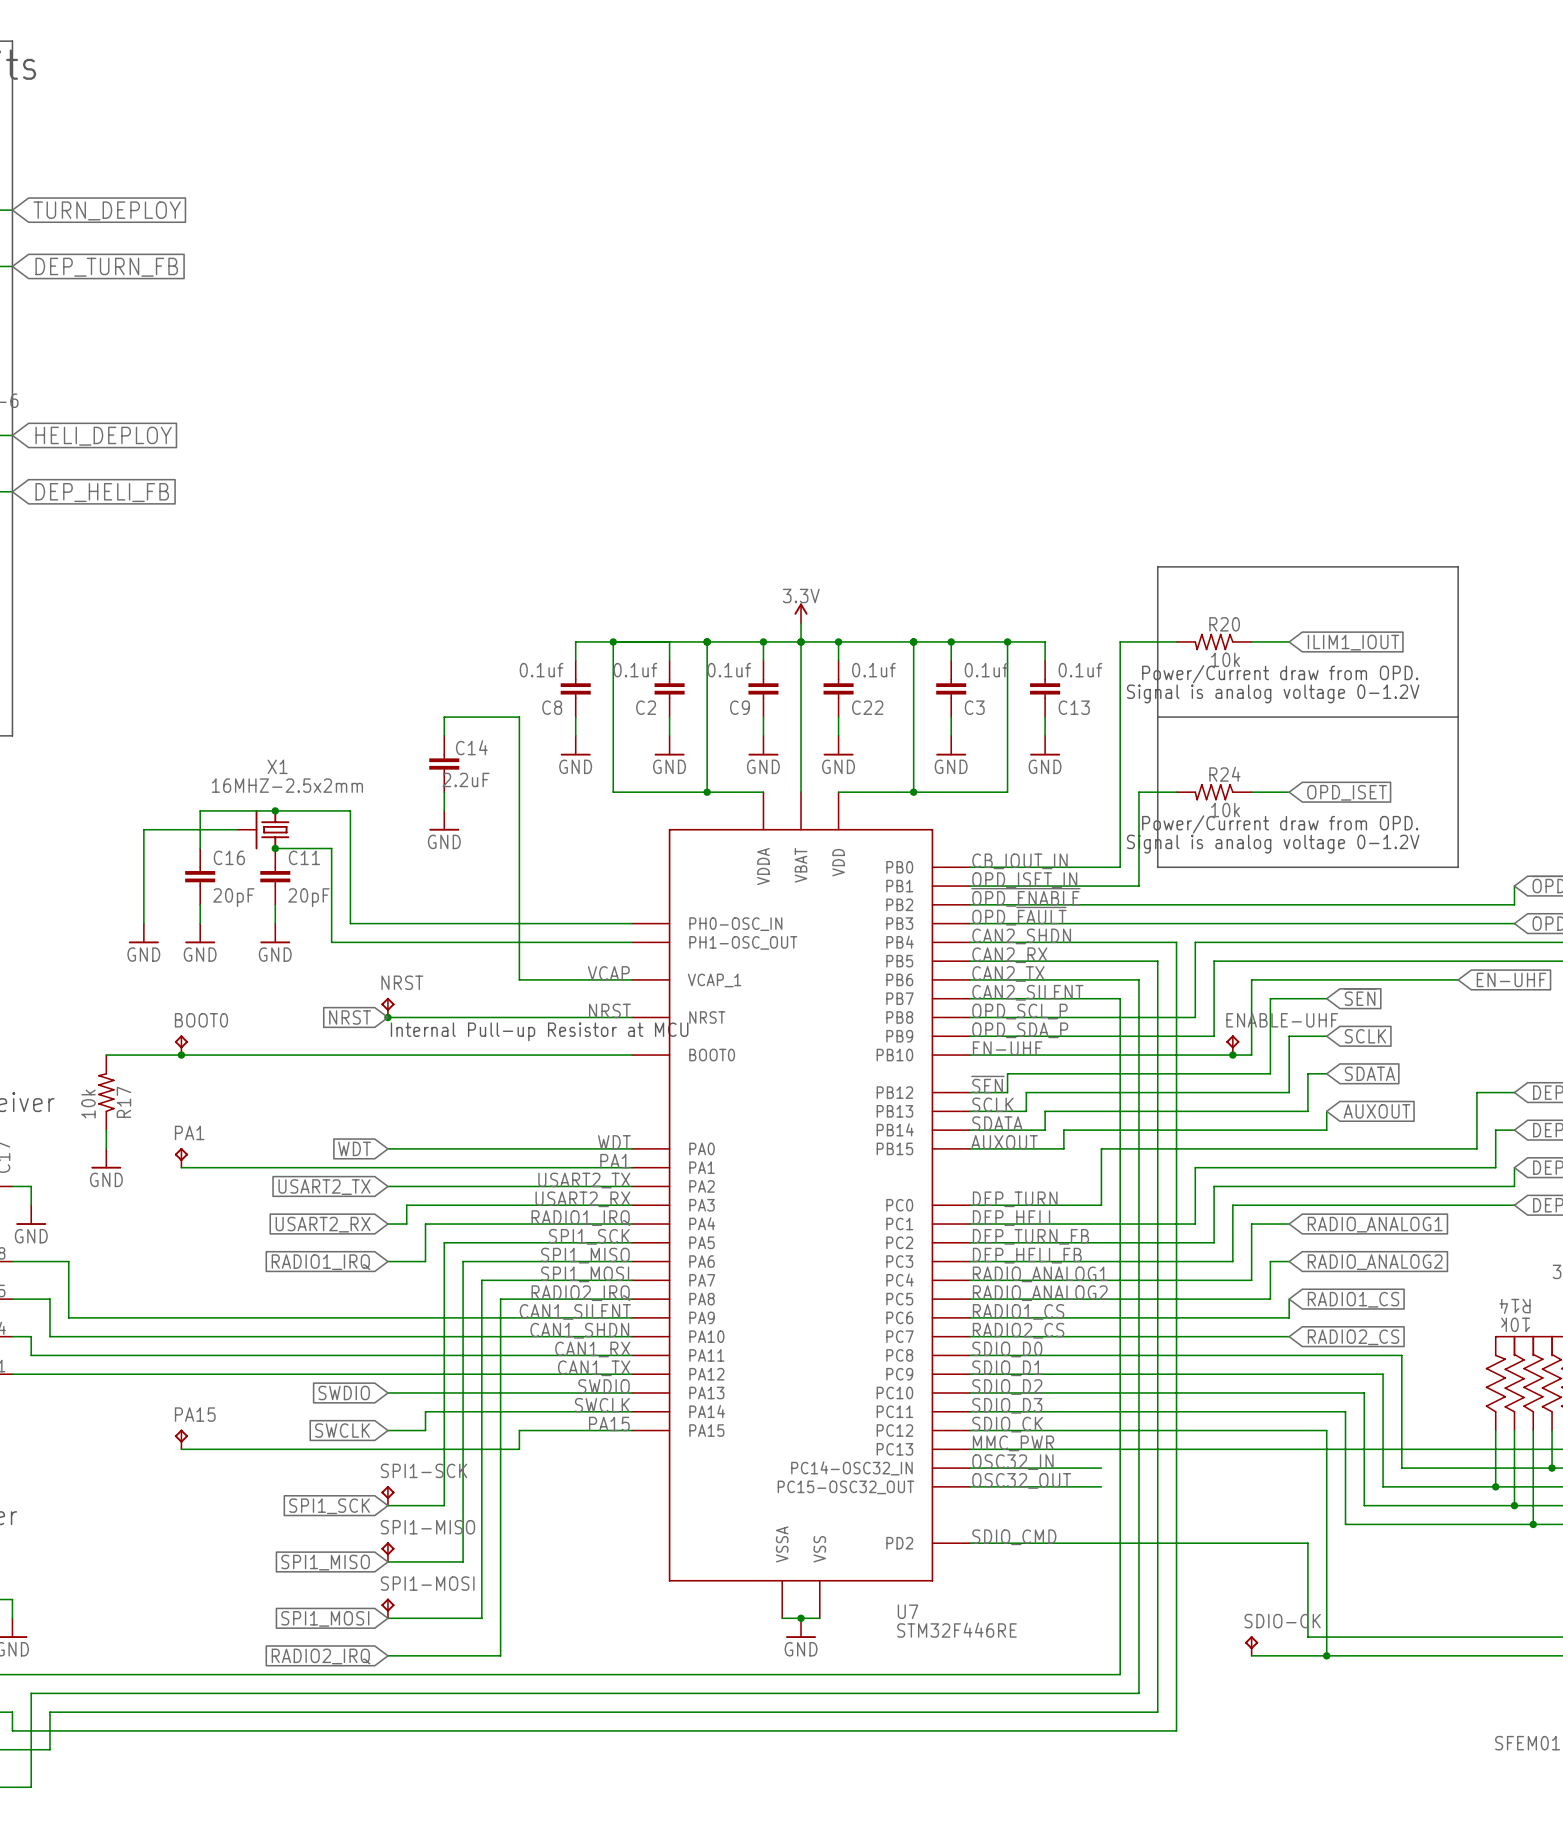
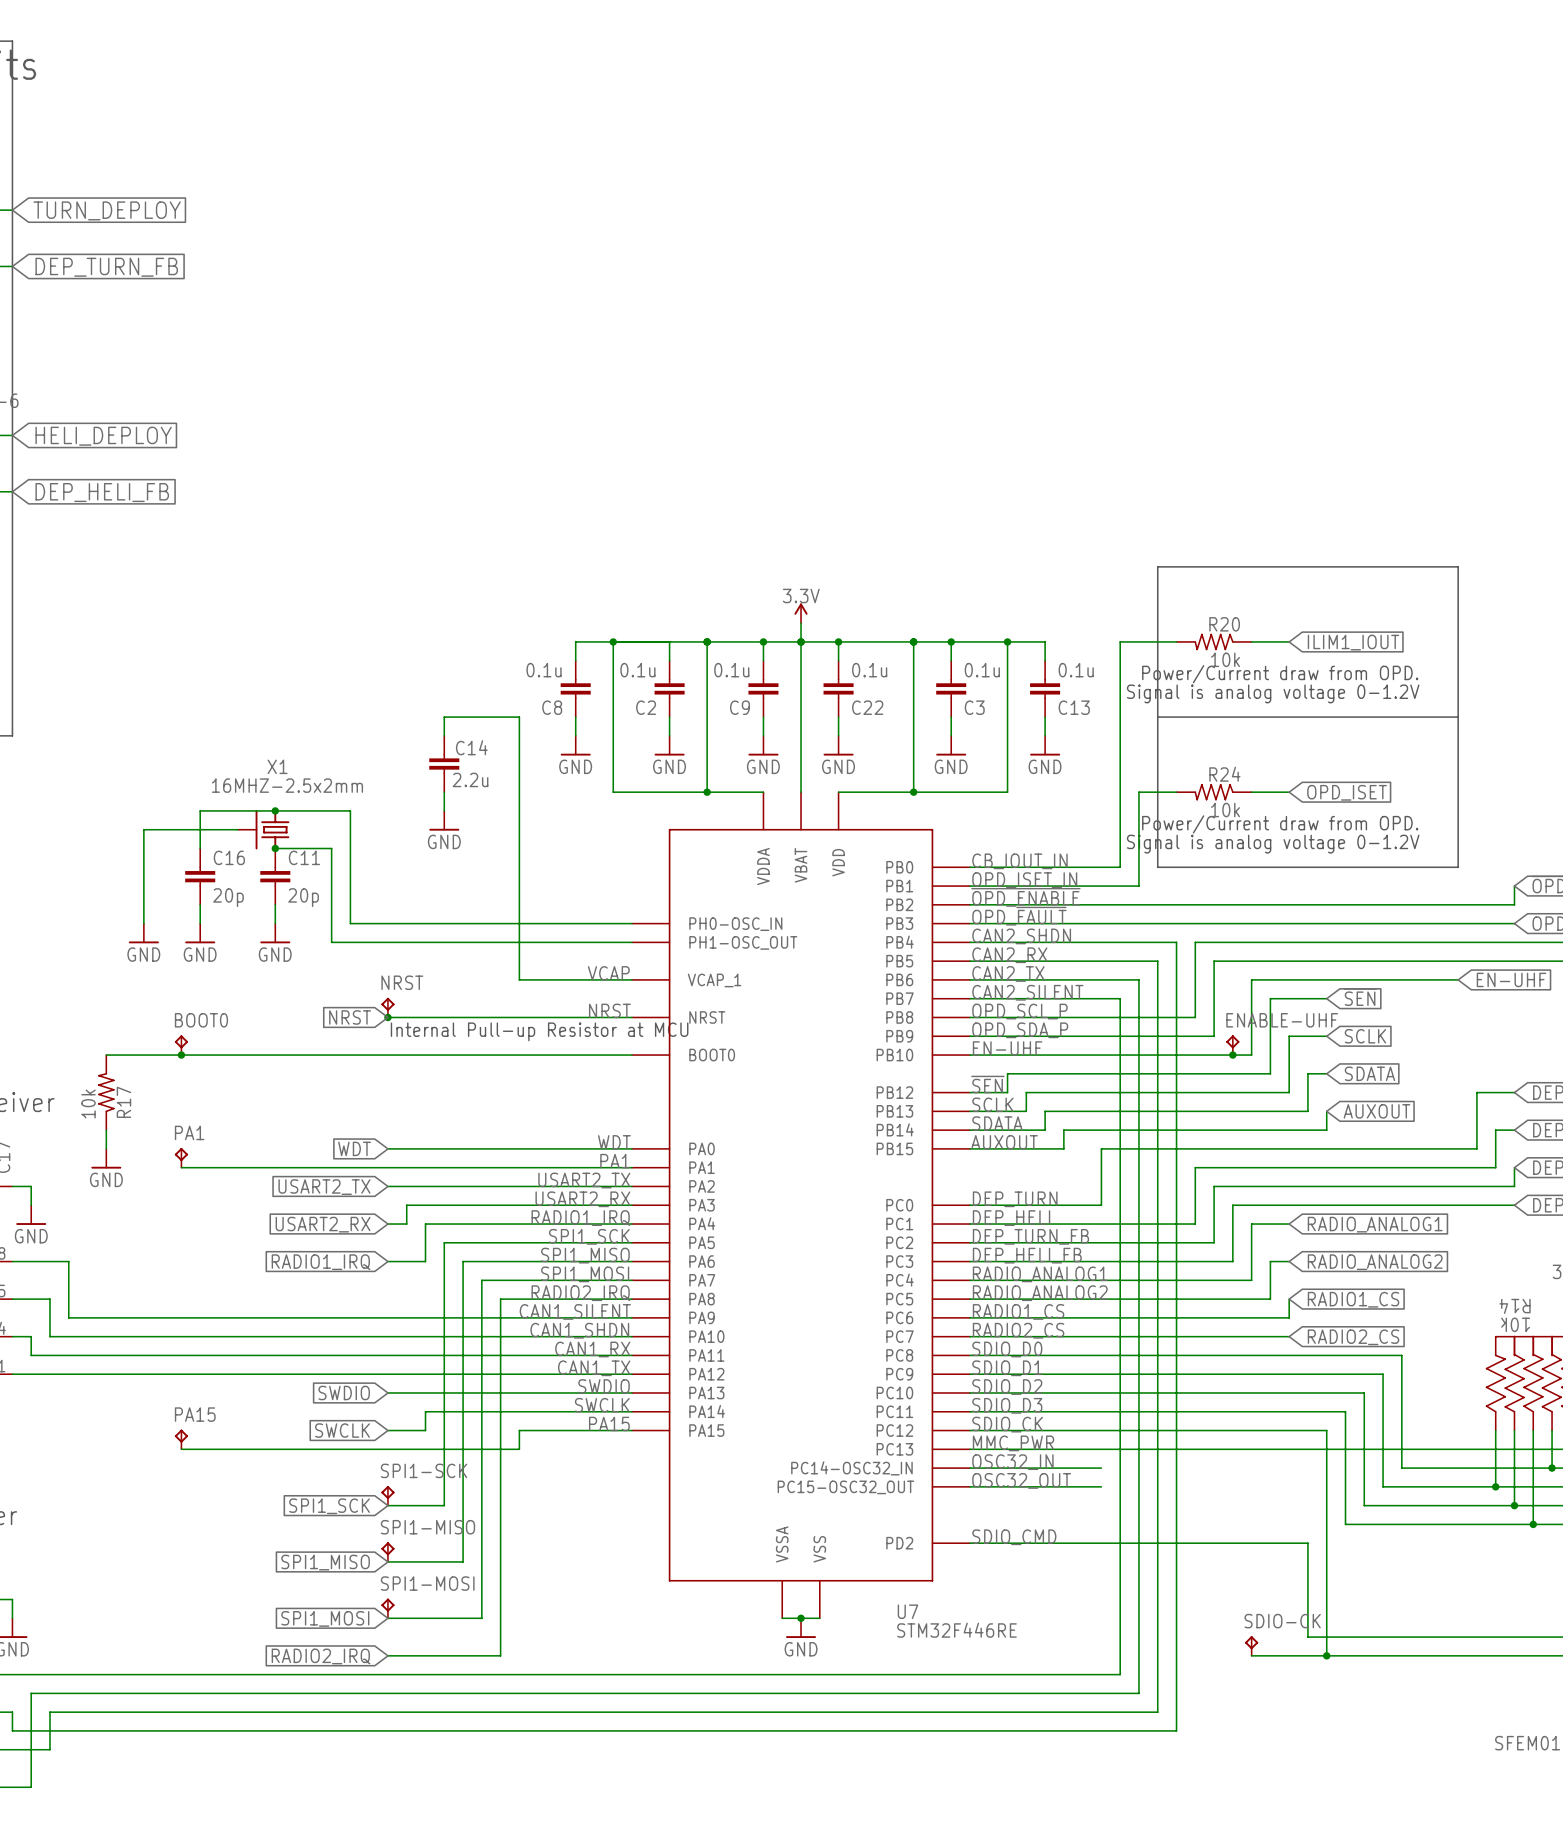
C8 value: 0.1uf (541, 670) -> 0.1u (544, 670)
C2 value: 0.1uf (635, 670) -> 0.1u (637, 670)
C9 value: 0.1uf (729, 670) -> 0.1u (731, 670)
C22 value: 0.1uf (873, 670) -> 0.1u (869, 670)
C3 value: 0.1uf (986, 670) -> 0.1u (982, 670)
C13 value: 0.1uf (1080, 670) -> 0.1u (1076, 670)
C14 value: 2.2uF (466, 779) -> 2.2u (470, 779)
C16 value: 20pF (233, 897) -> 20p (228, 897)
C11 value: 20pF (308, 897) -> 20p (303, 897)

